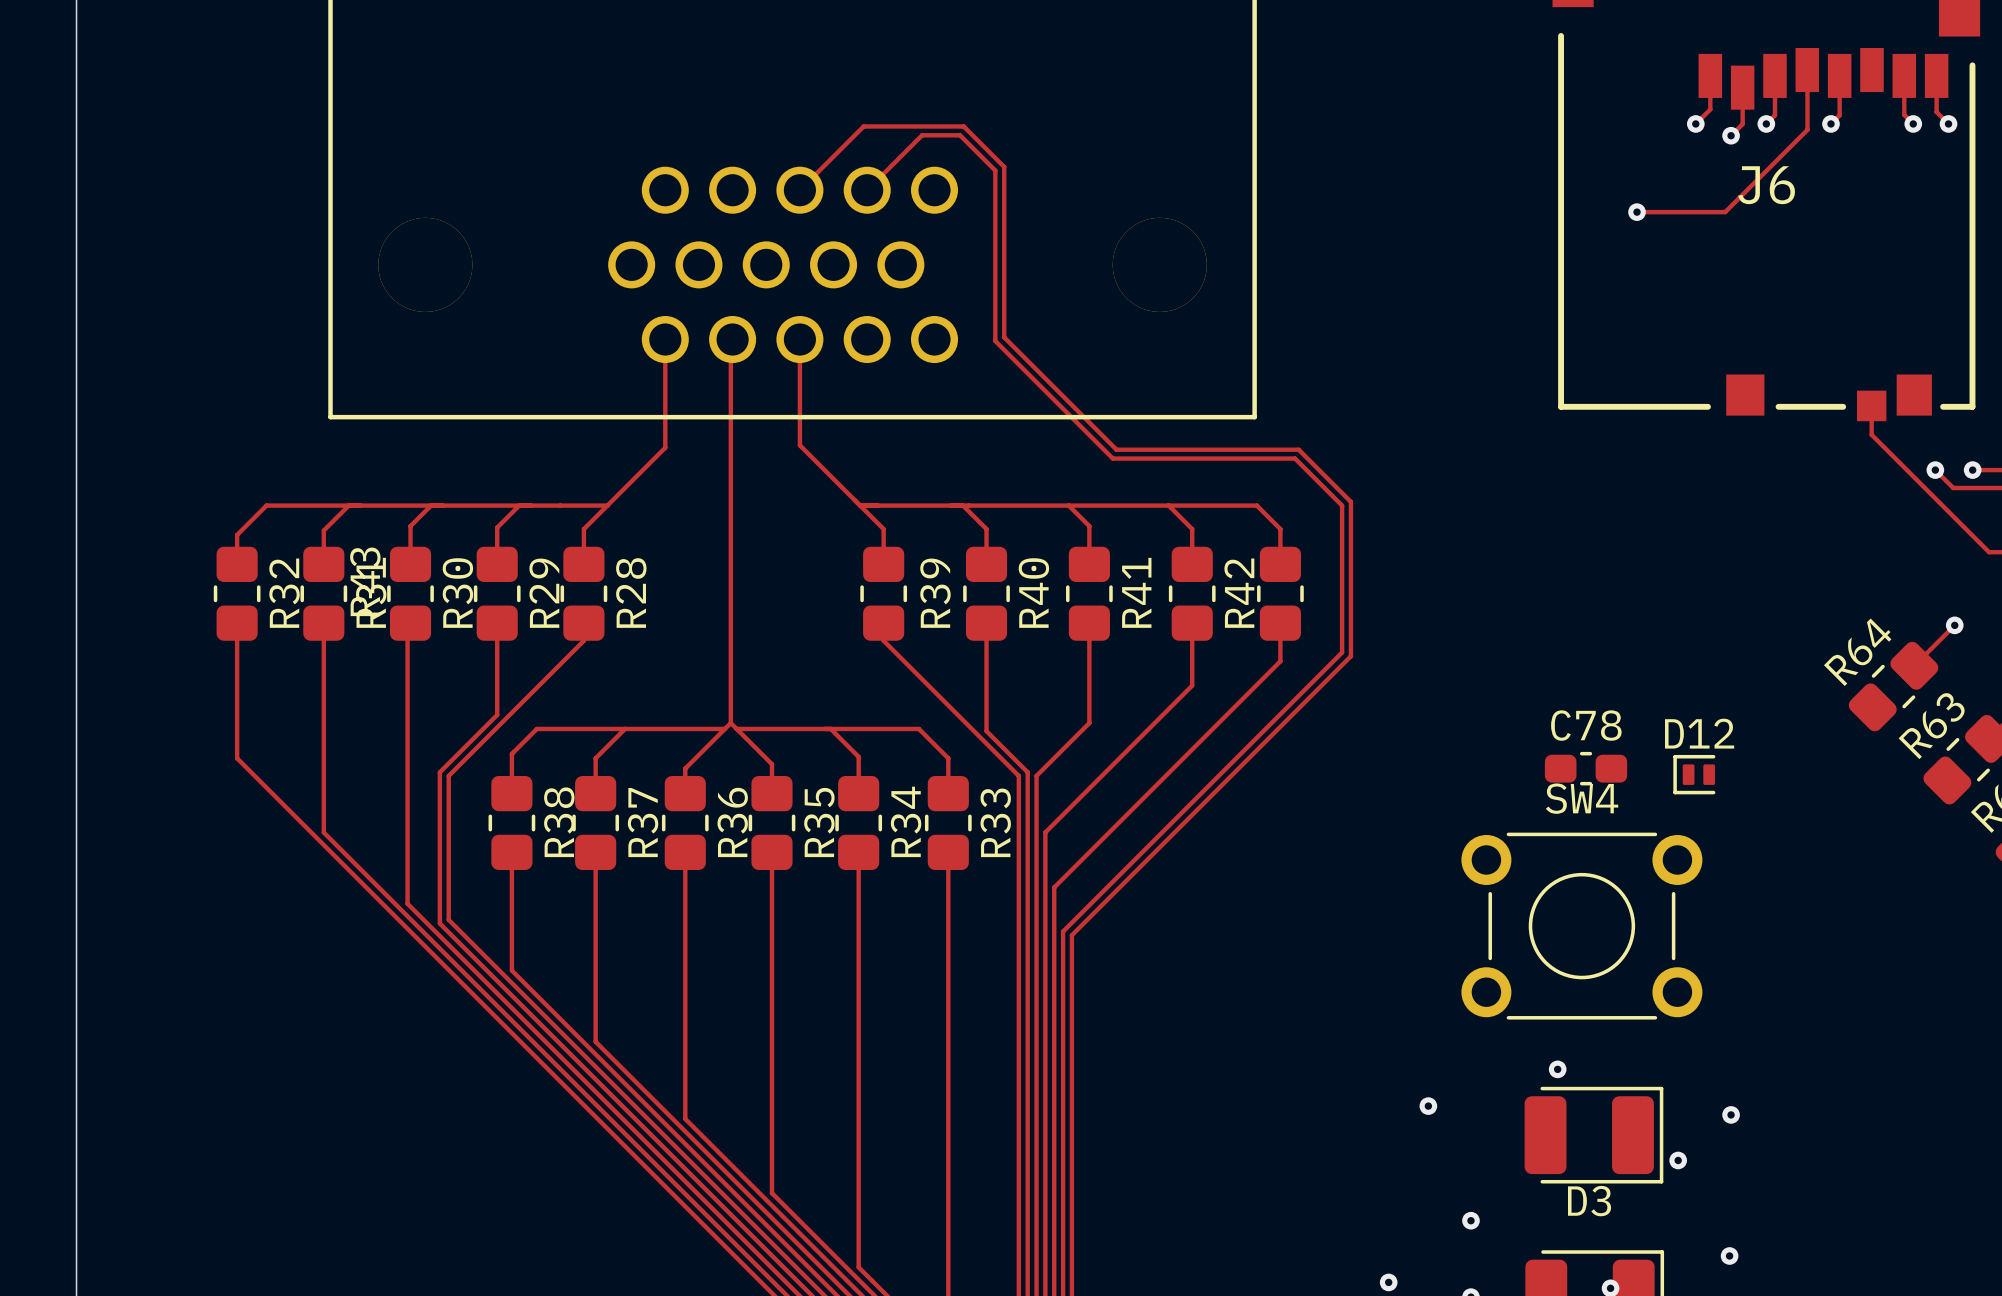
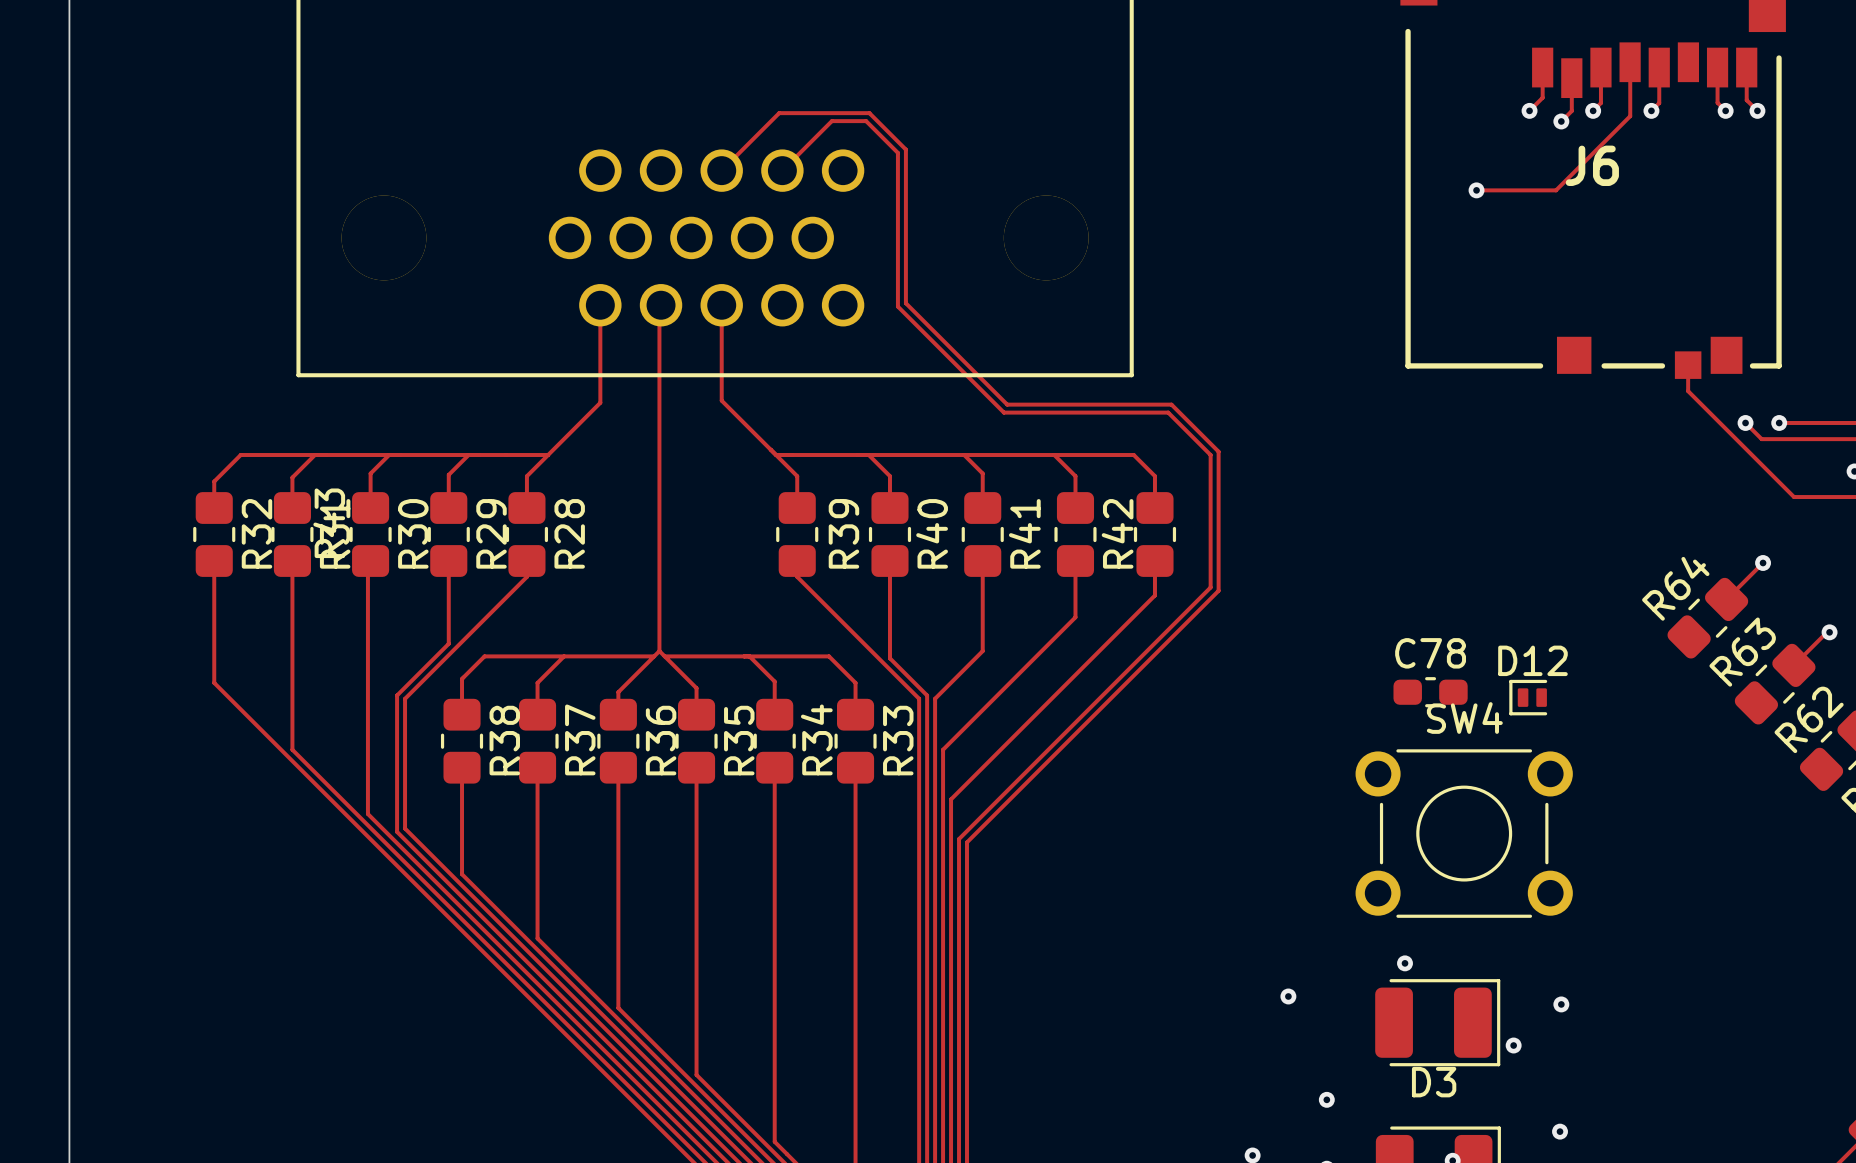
SW4 position: (1581, 926) -> (1464, 833)

